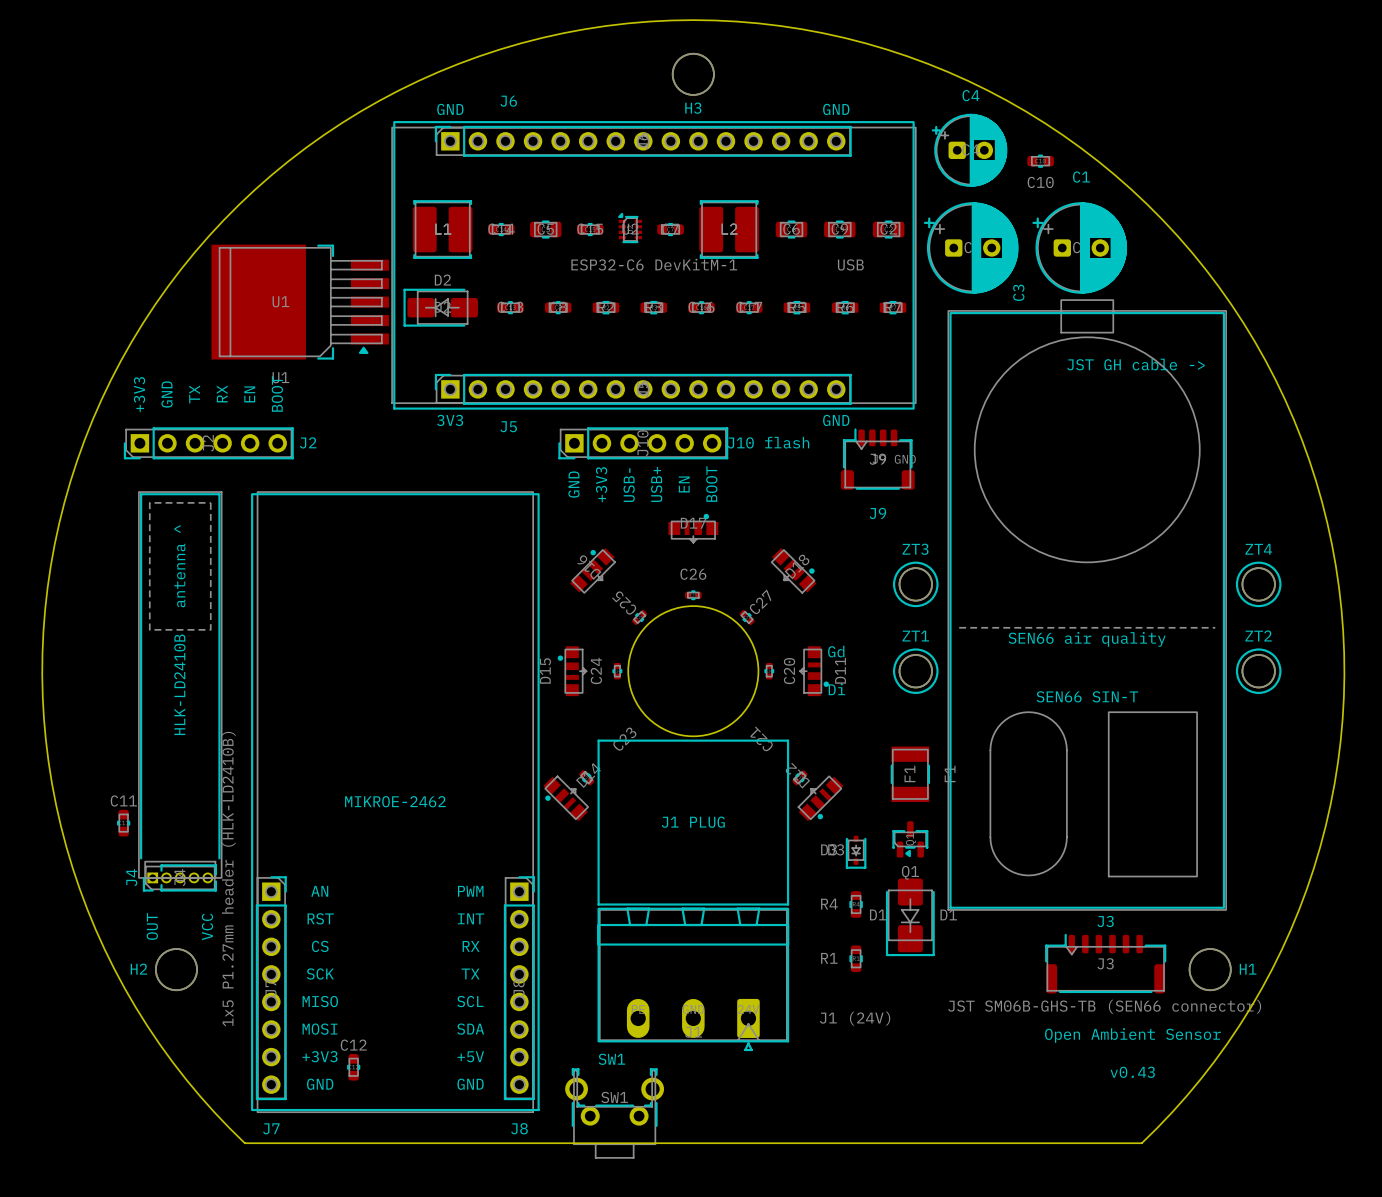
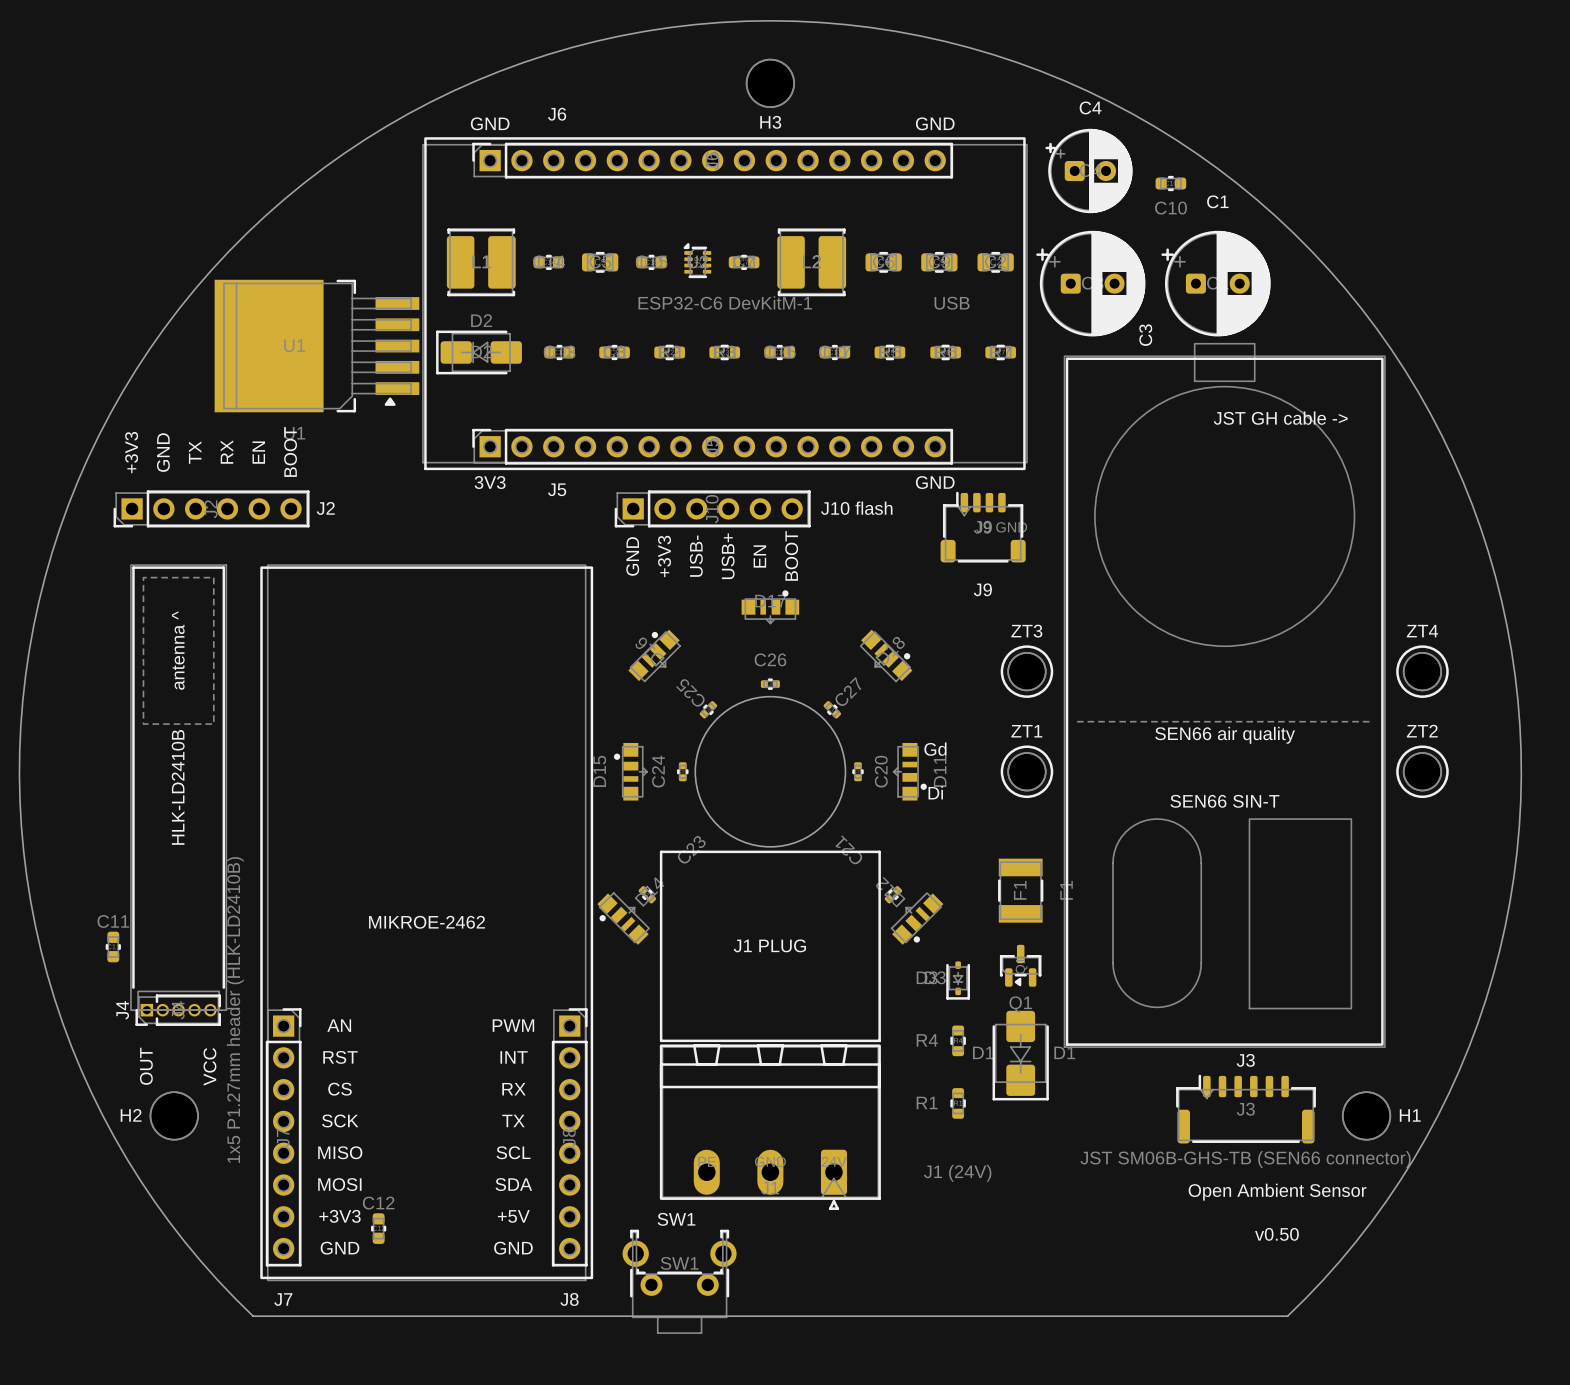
text: v0.43 (1132, 1072) -> v0.50 (1276, 1234)

